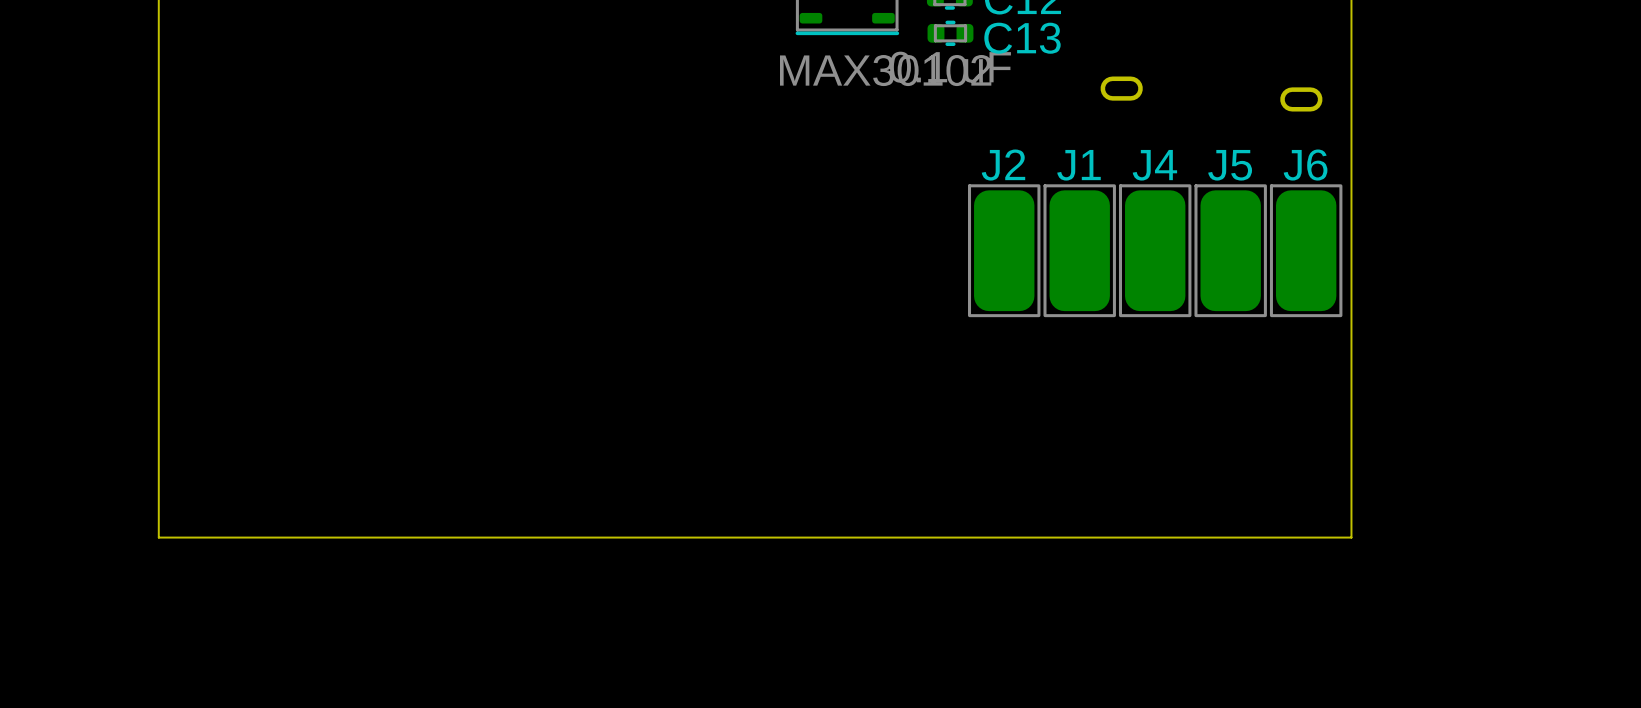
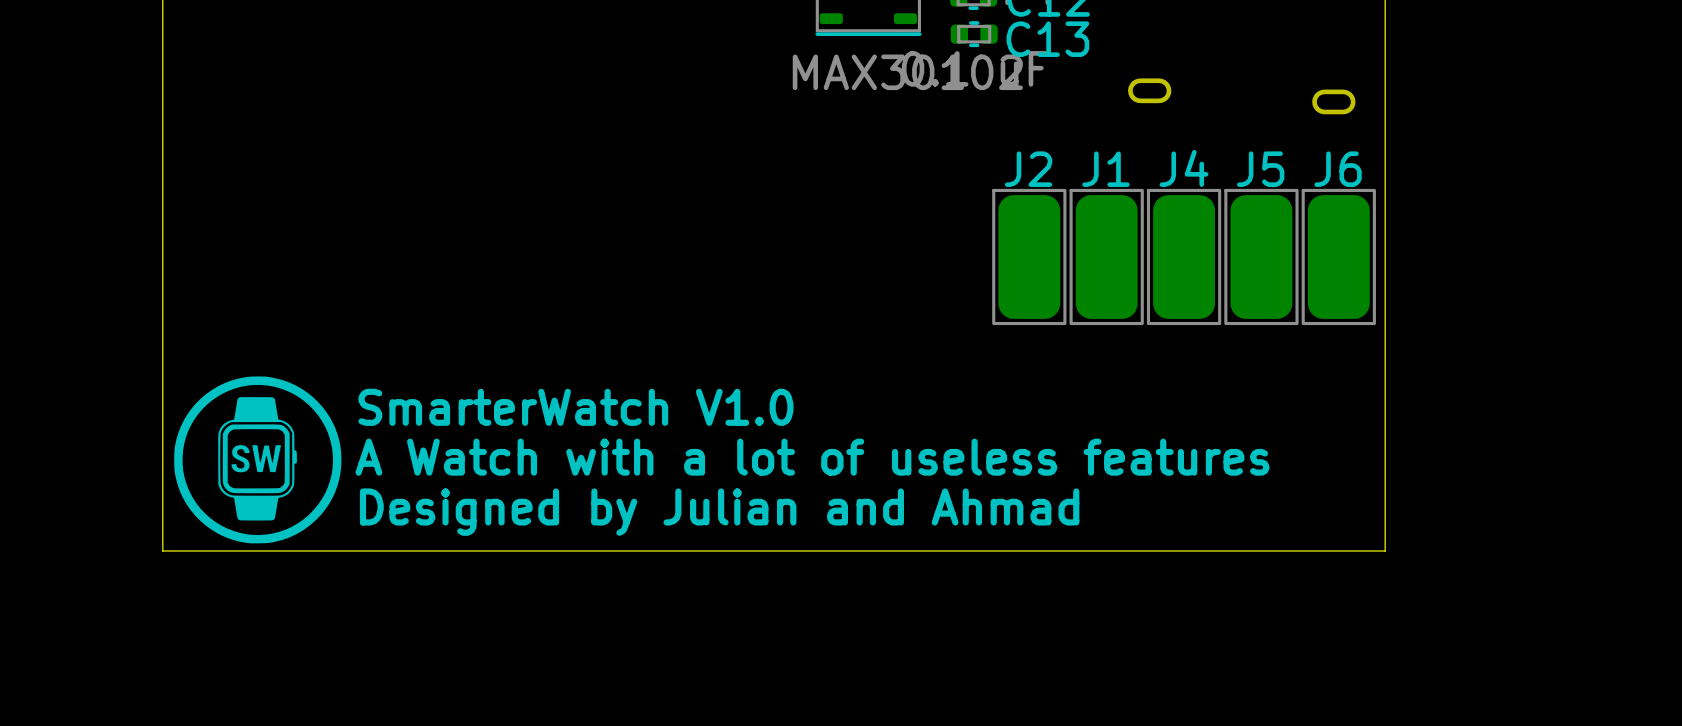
drawing: none -> [174, 376, 342, 544]
text: none -> SmarterWatch V1.0 (575, 407)
text: none -> A Watch with a lot of useless features (812, 457)
text: none -> Designed by Julian and Ahmad (719, 512)

